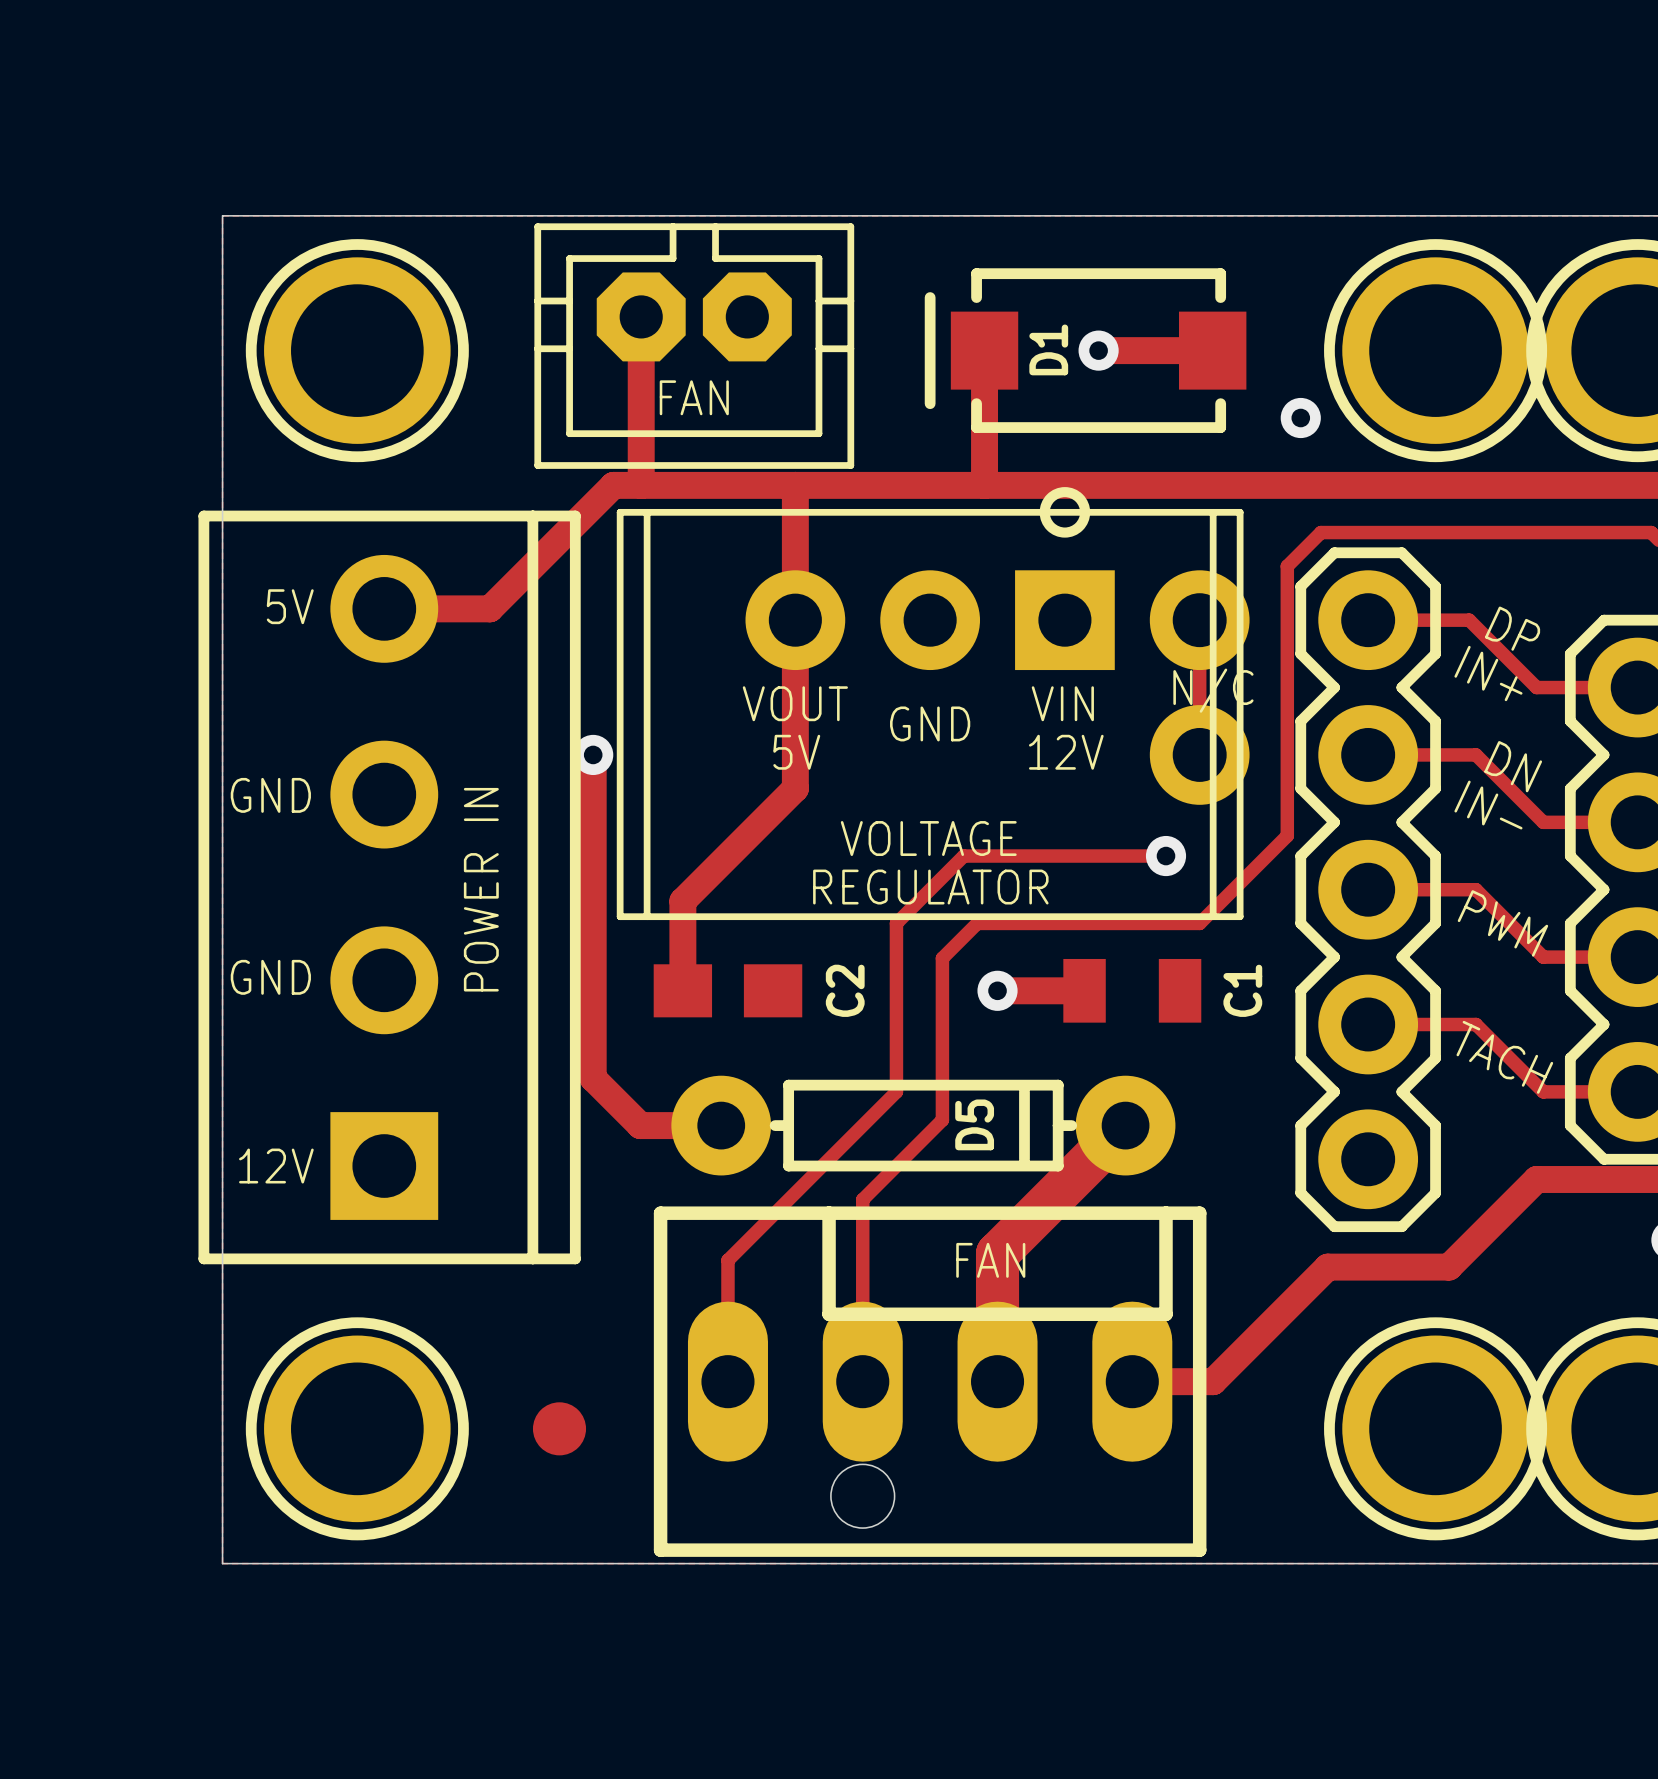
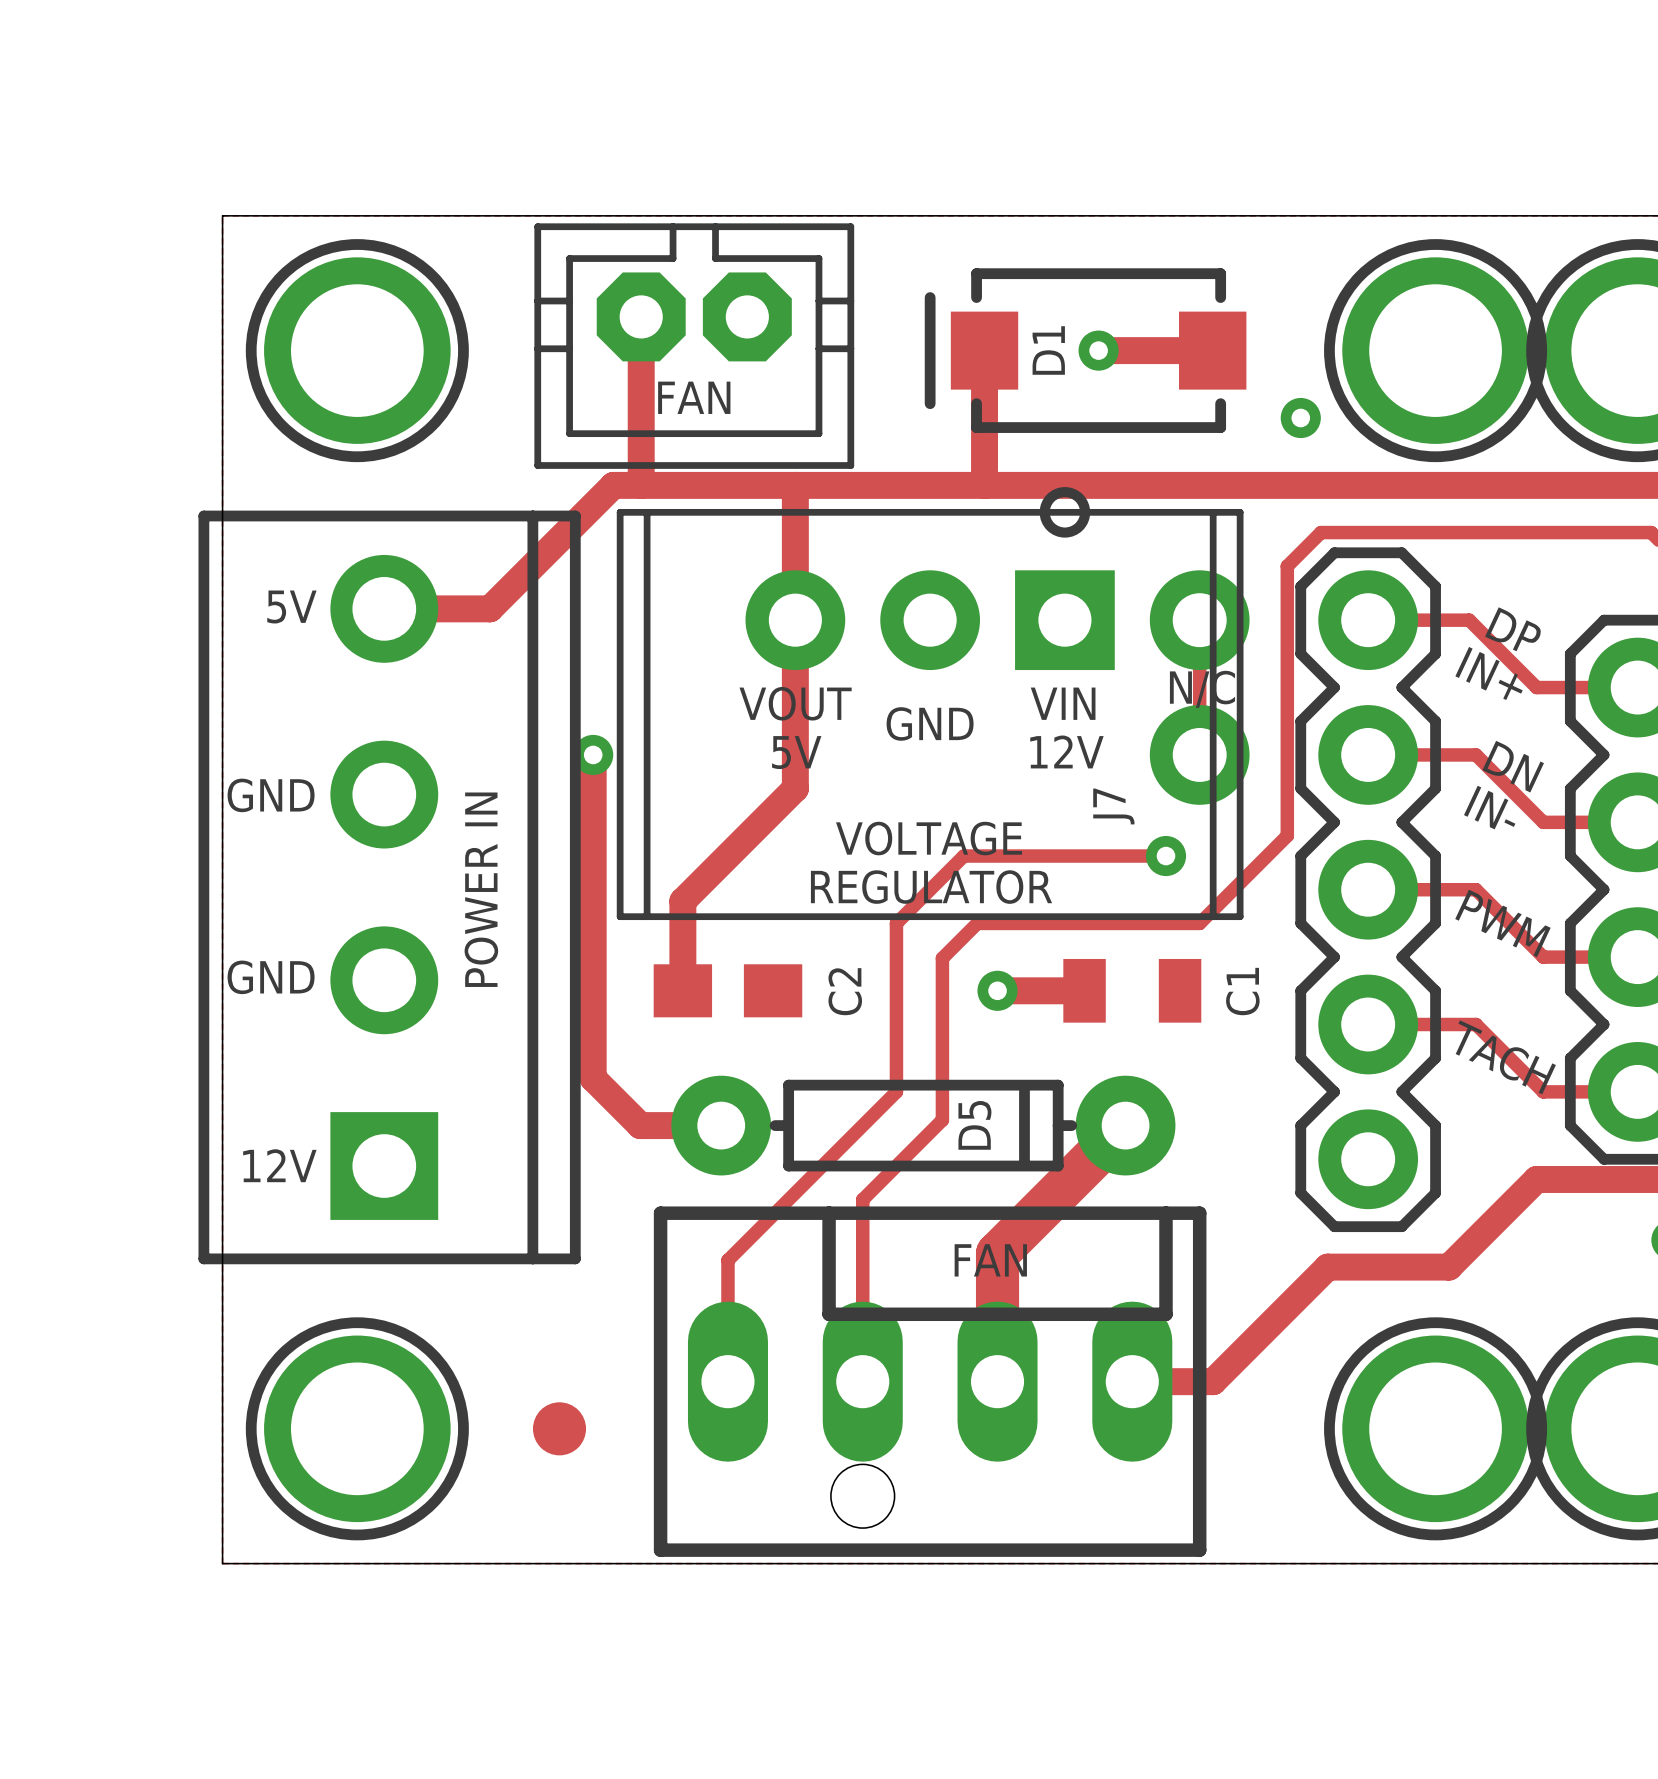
J7 name: none -> J7 (1113, 806)

